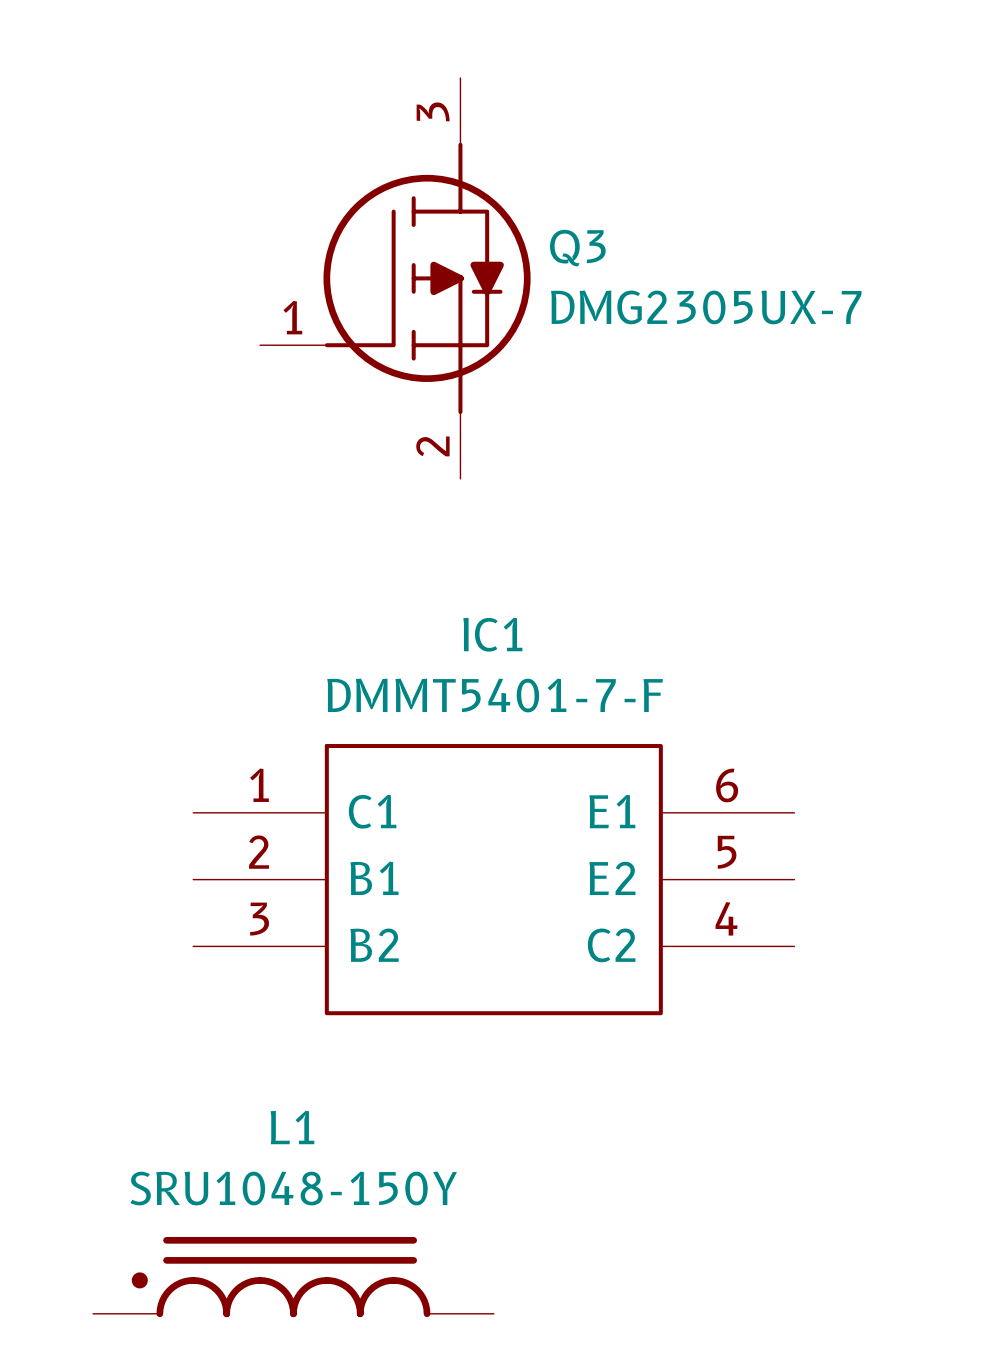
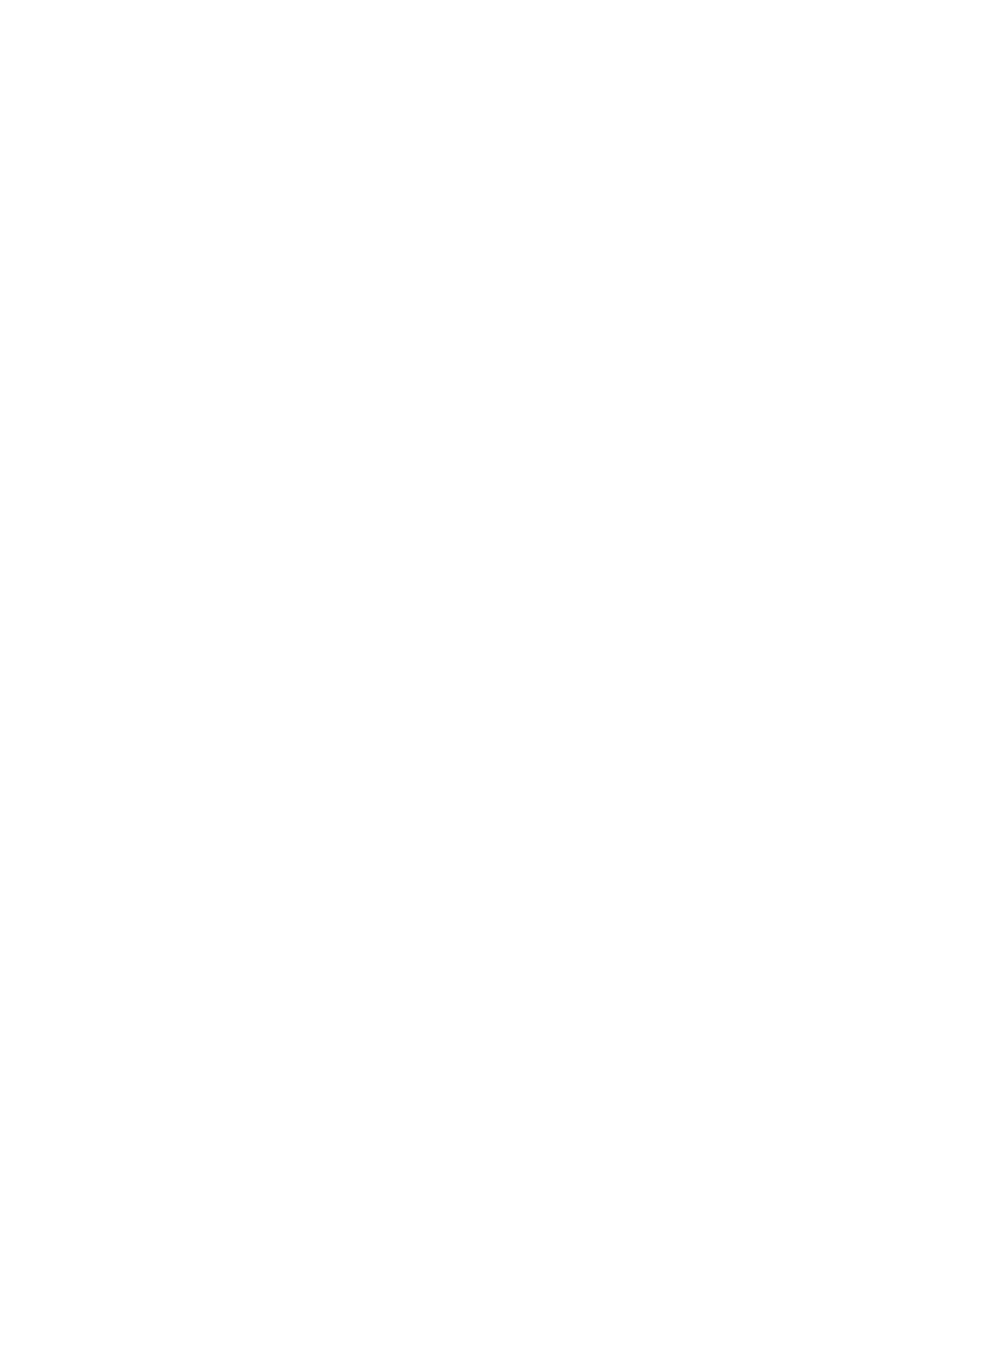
Q3: DMG2305UX-7 (395, 278) -> none
IC1: DMMT5401-7-F (493, 879) -> none
L1: SRU1048-150Y (293, 1277) -> none

